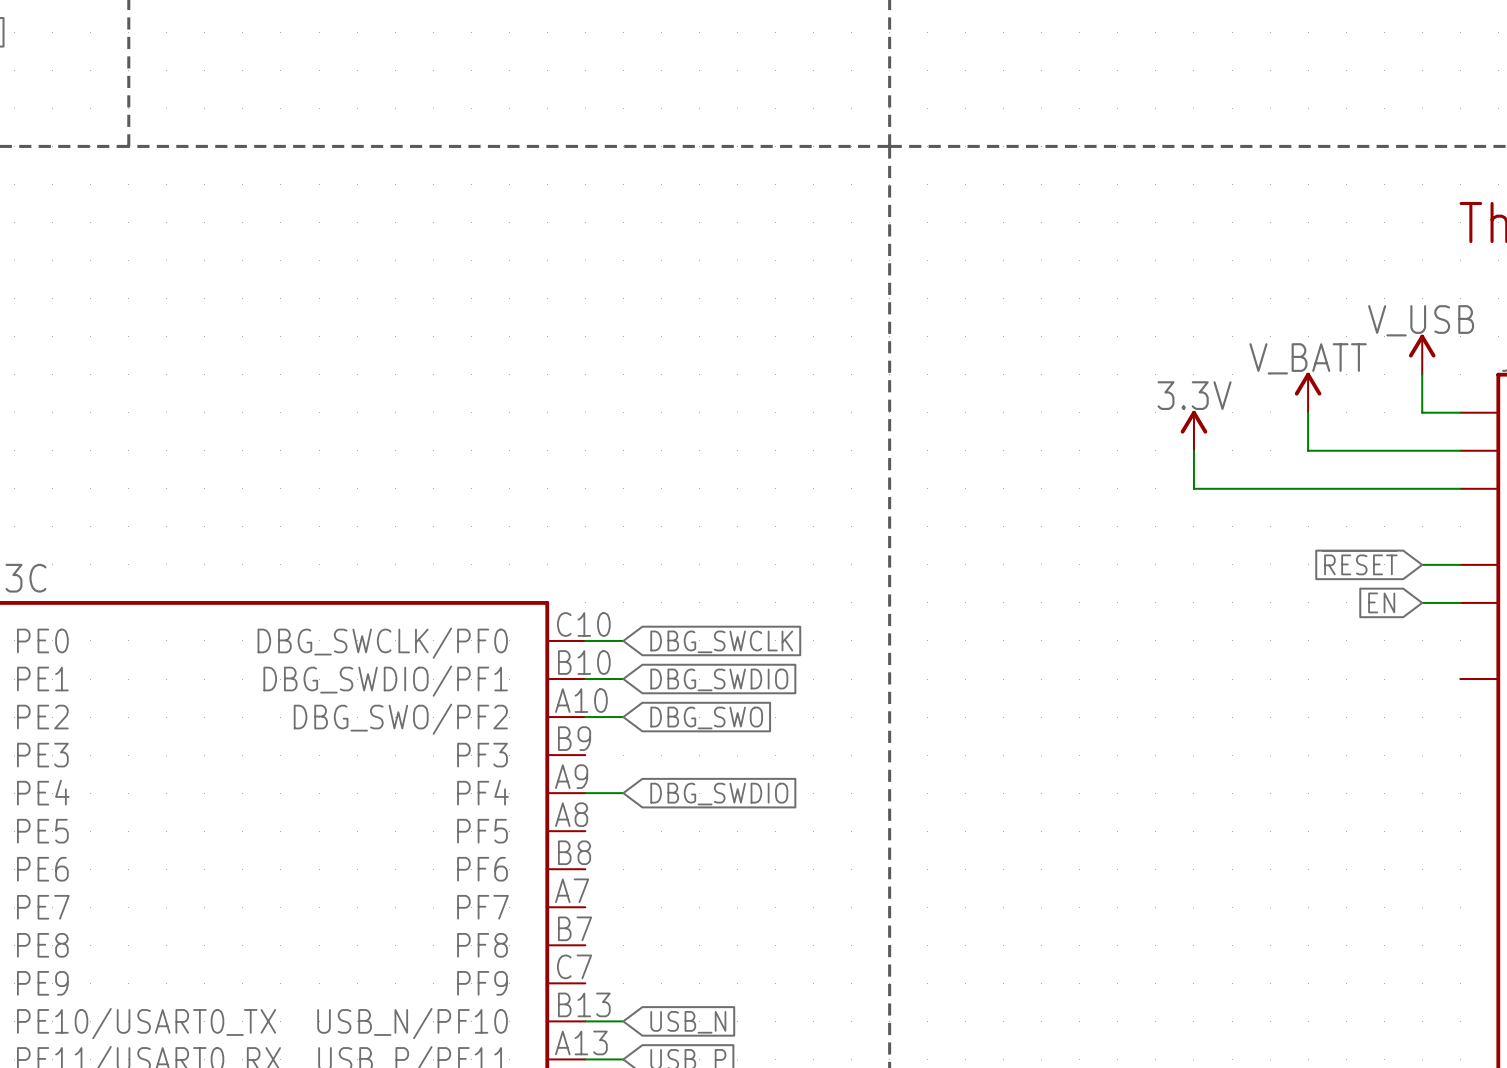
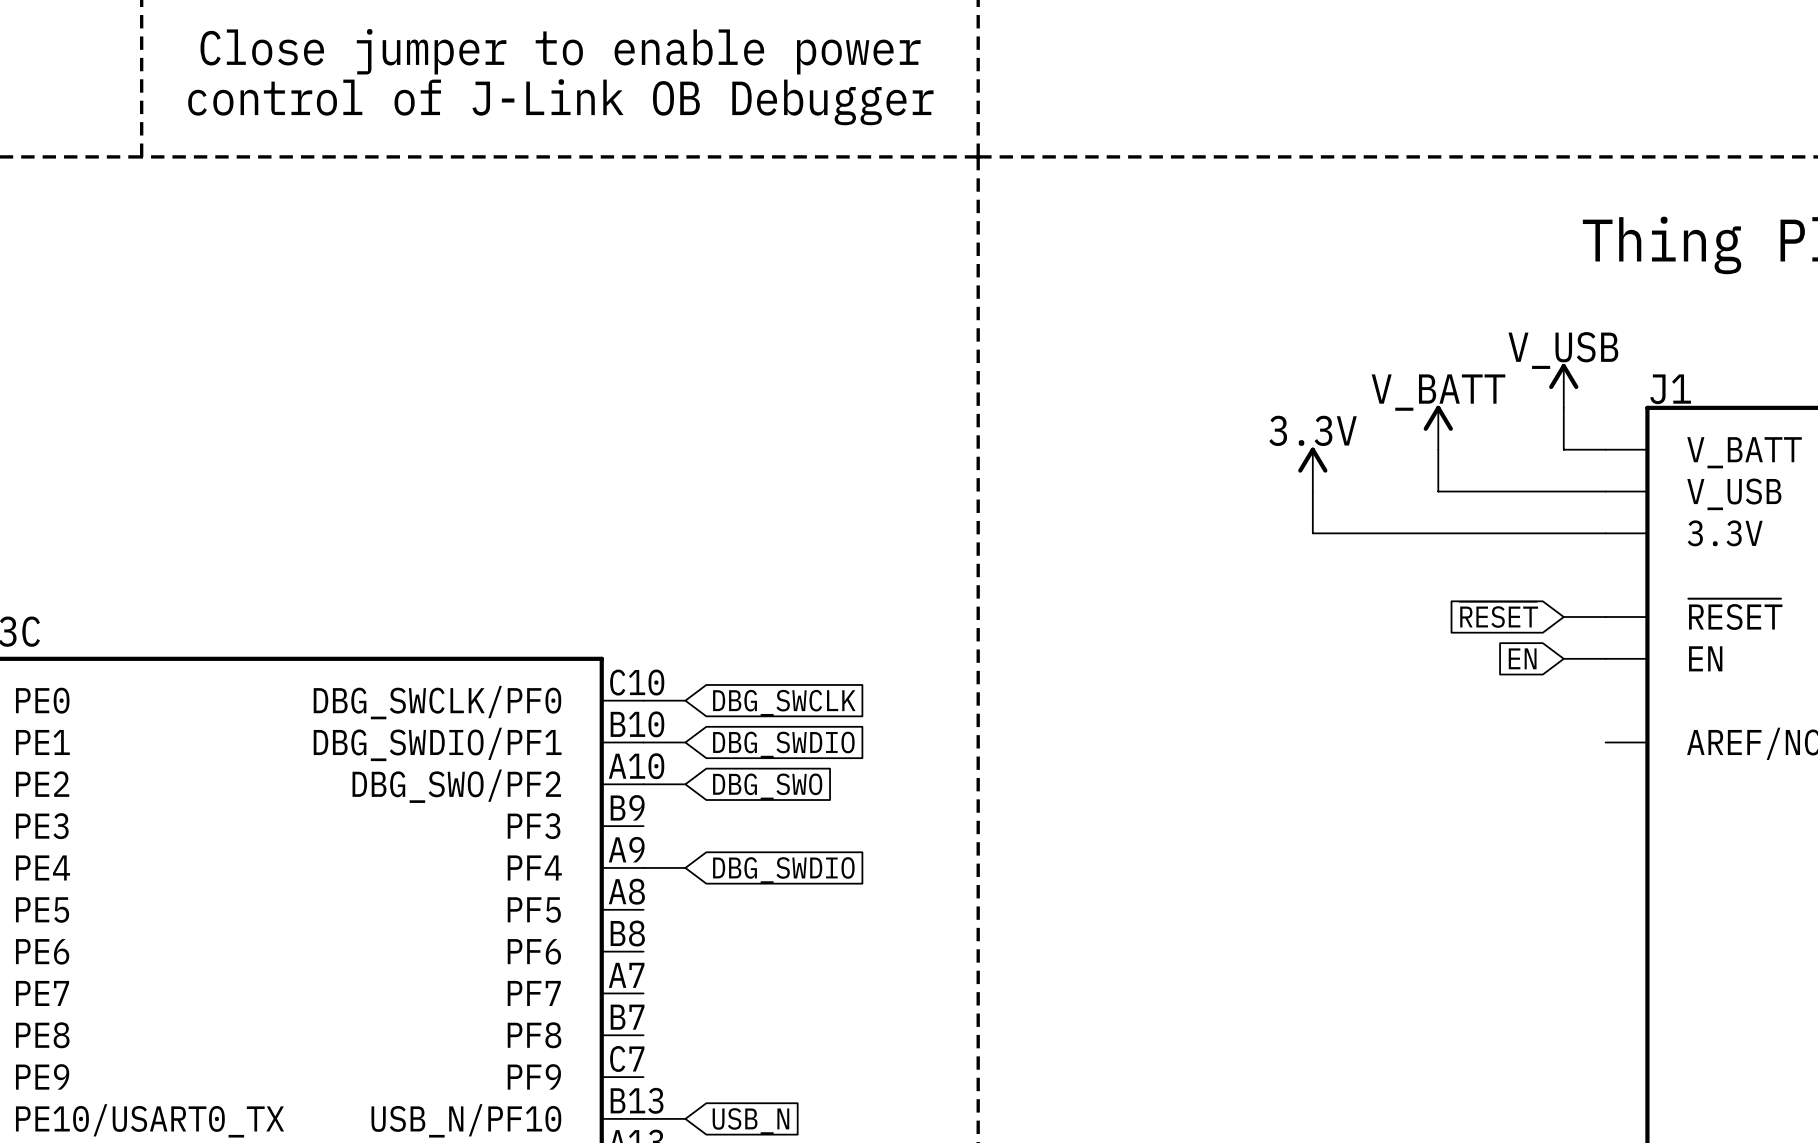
text: none -> Close jumper to enable power (560, 51)
text: none -> control of J-Link OB Debugger (560, 102)

